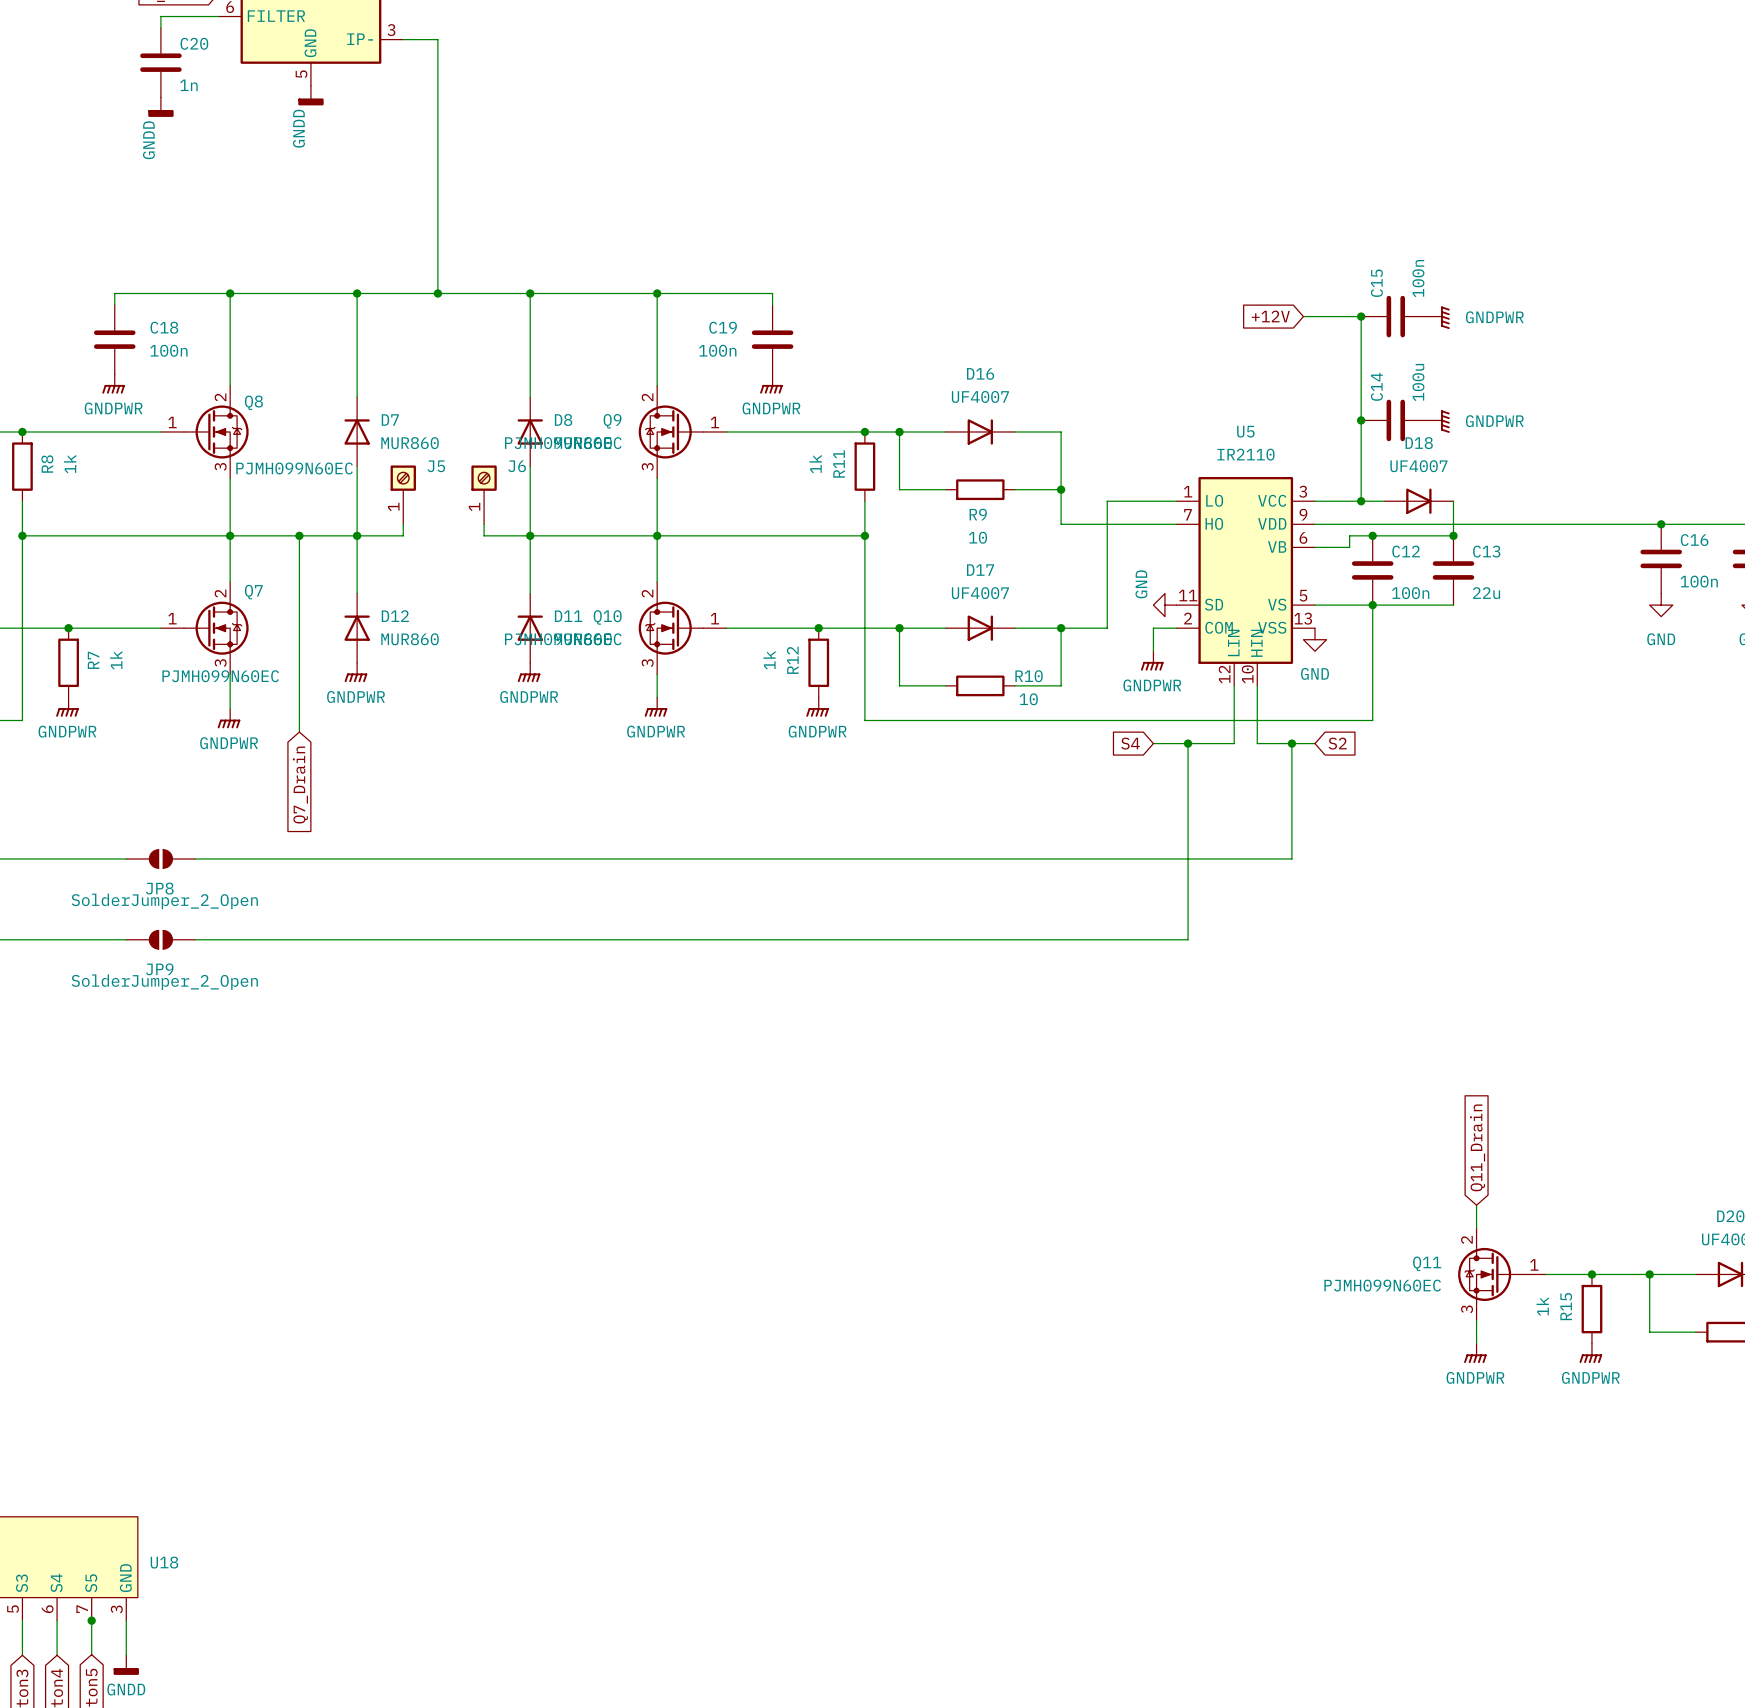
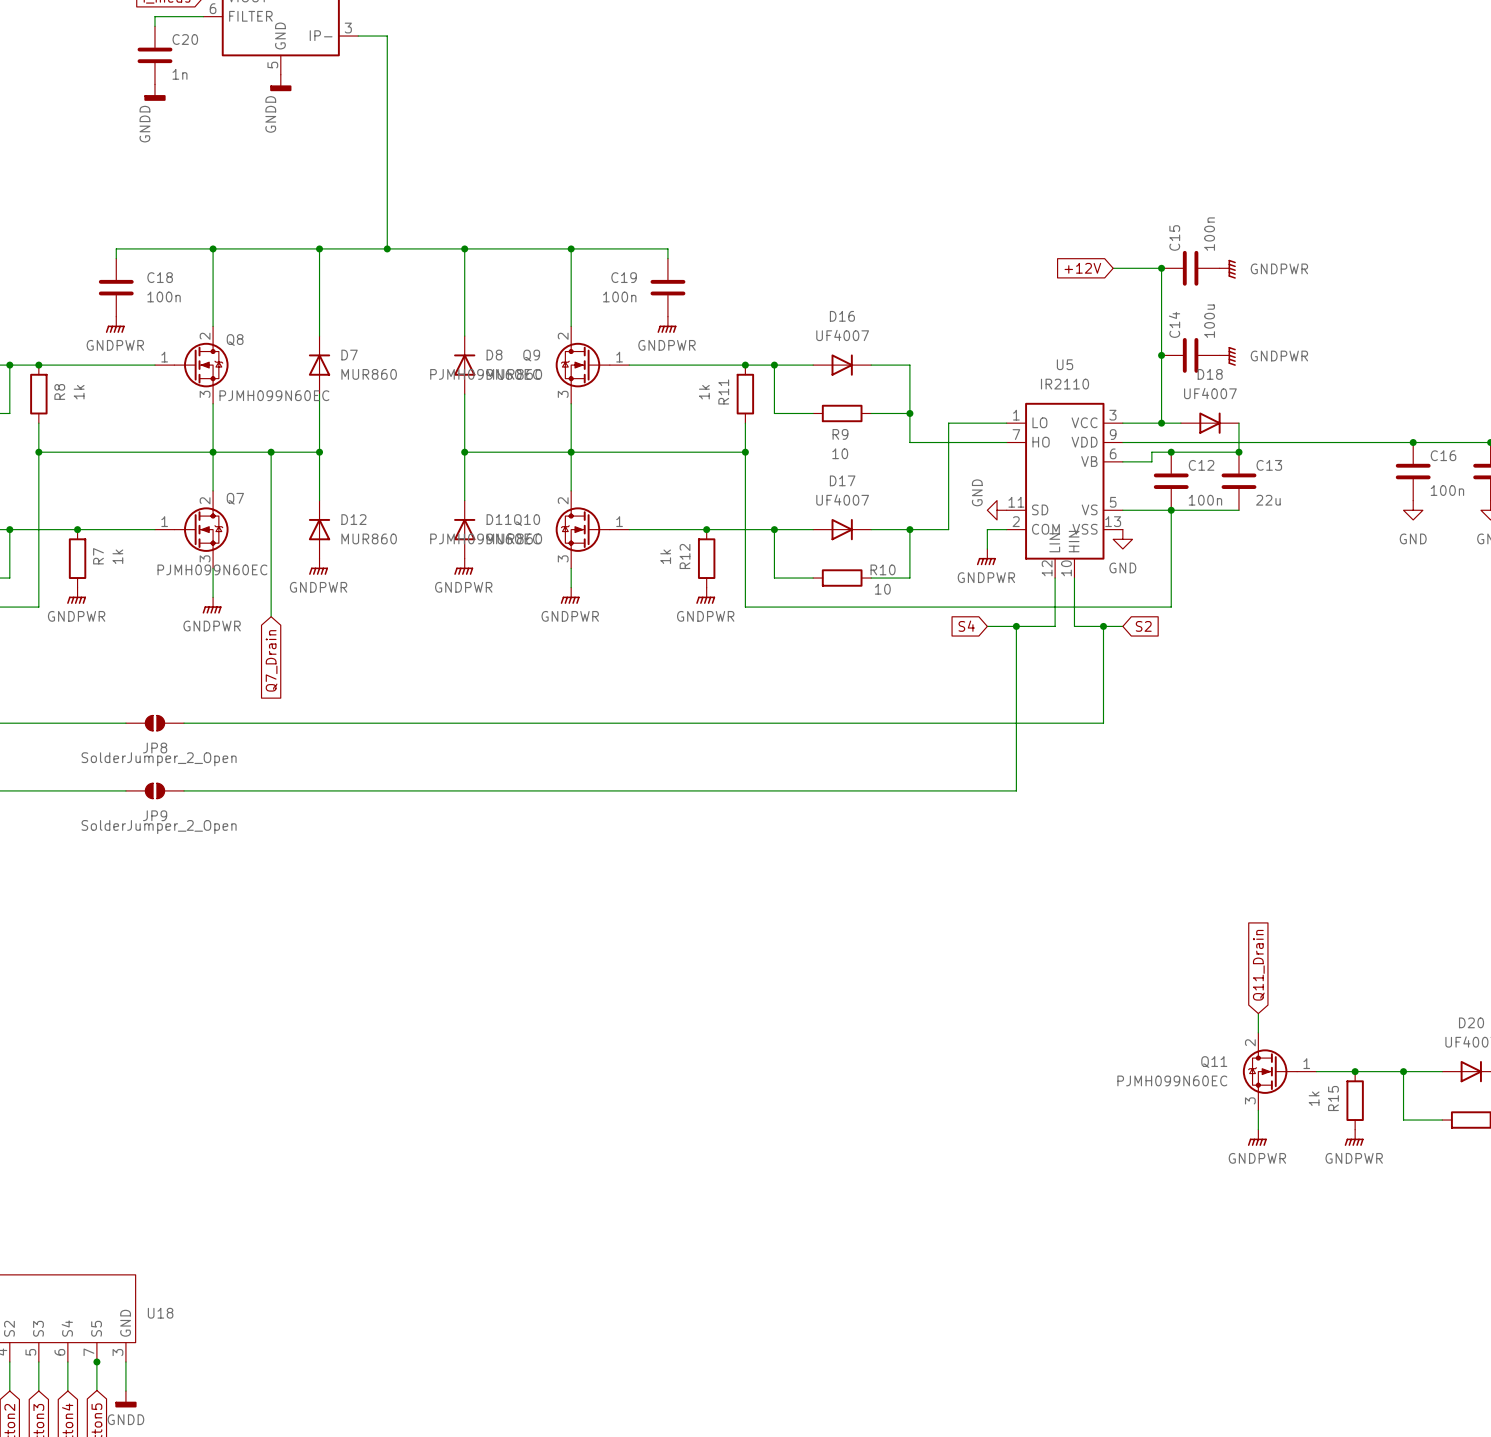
J5: (403, 494) -> none
J6: (484, 494) -> none
wire: (403, 524) (403, 535) (357, 535) -> none
wire: (484, 524) (484, 535) (530, 535) -> none

